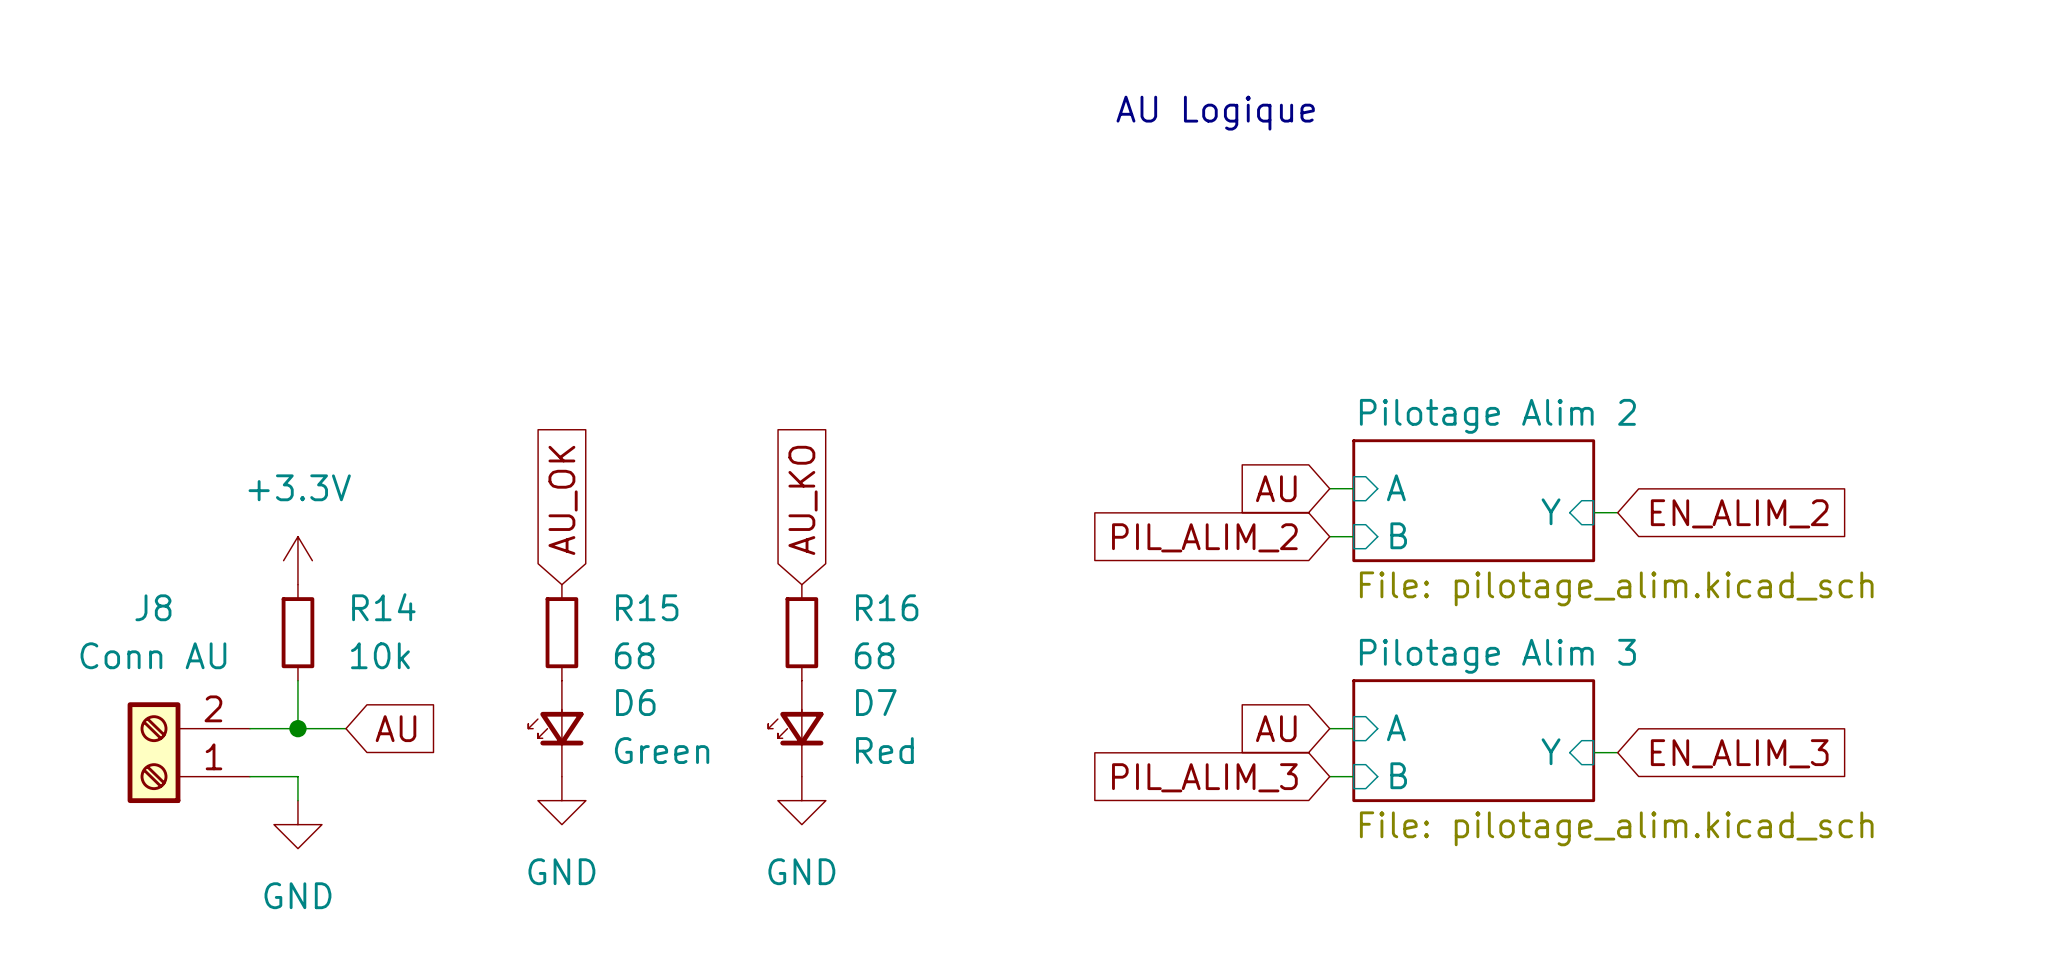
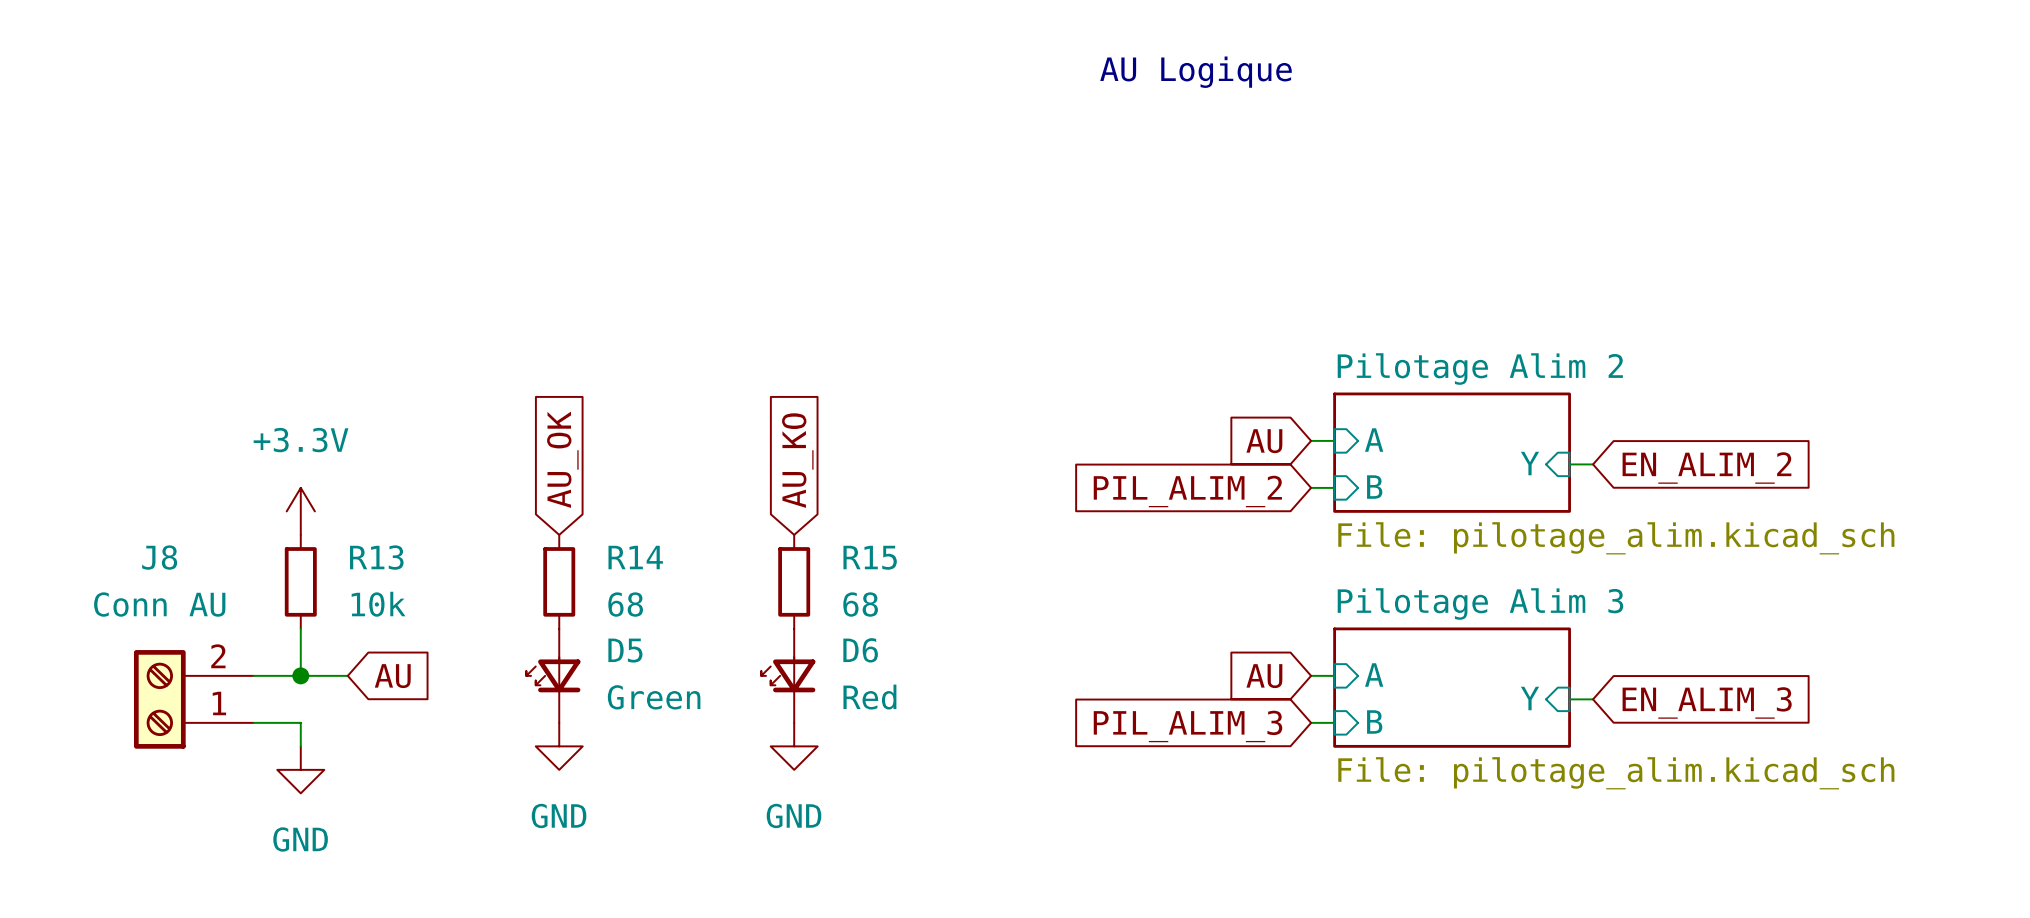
R14 name: R14 (383, 607) -> R13 (376, 557)
R15 name: R15 (647, 607) -> R14 (635, 557)
R16 name: R16 (887, 607) -> R15 (870, 557)
D6 name: D6 (635, 702) -> D5 (625, 650)
D7 name: D7 (876, 702) -> D6 (860, 650)

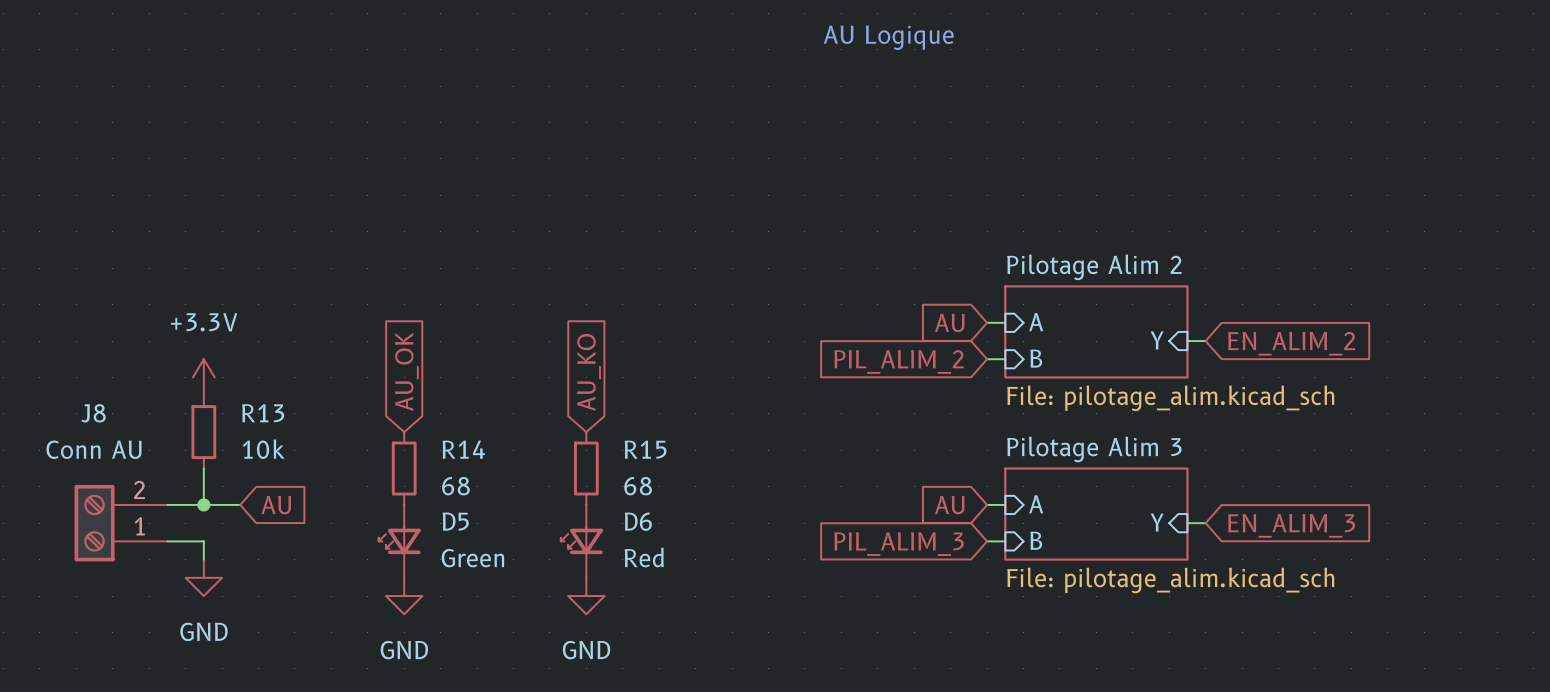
global label position: AU_OK (562, 459) -> AU_OK (406, 371)
global label position: AU_KO (797, 460) -> AU_KO (589, 372)
R14 position: (559, 581) -> (404, 468)
R15 position: (794, 581) -> (586, 468)
D5 position: (553, 675) -> (399, 541)
D6 position: (788, 675) -> (581, 541)
power symbol position: GND (559, 746) -> GND (404, 596)
power symbol position: GND (794, 746) -> GND (586, 596)

